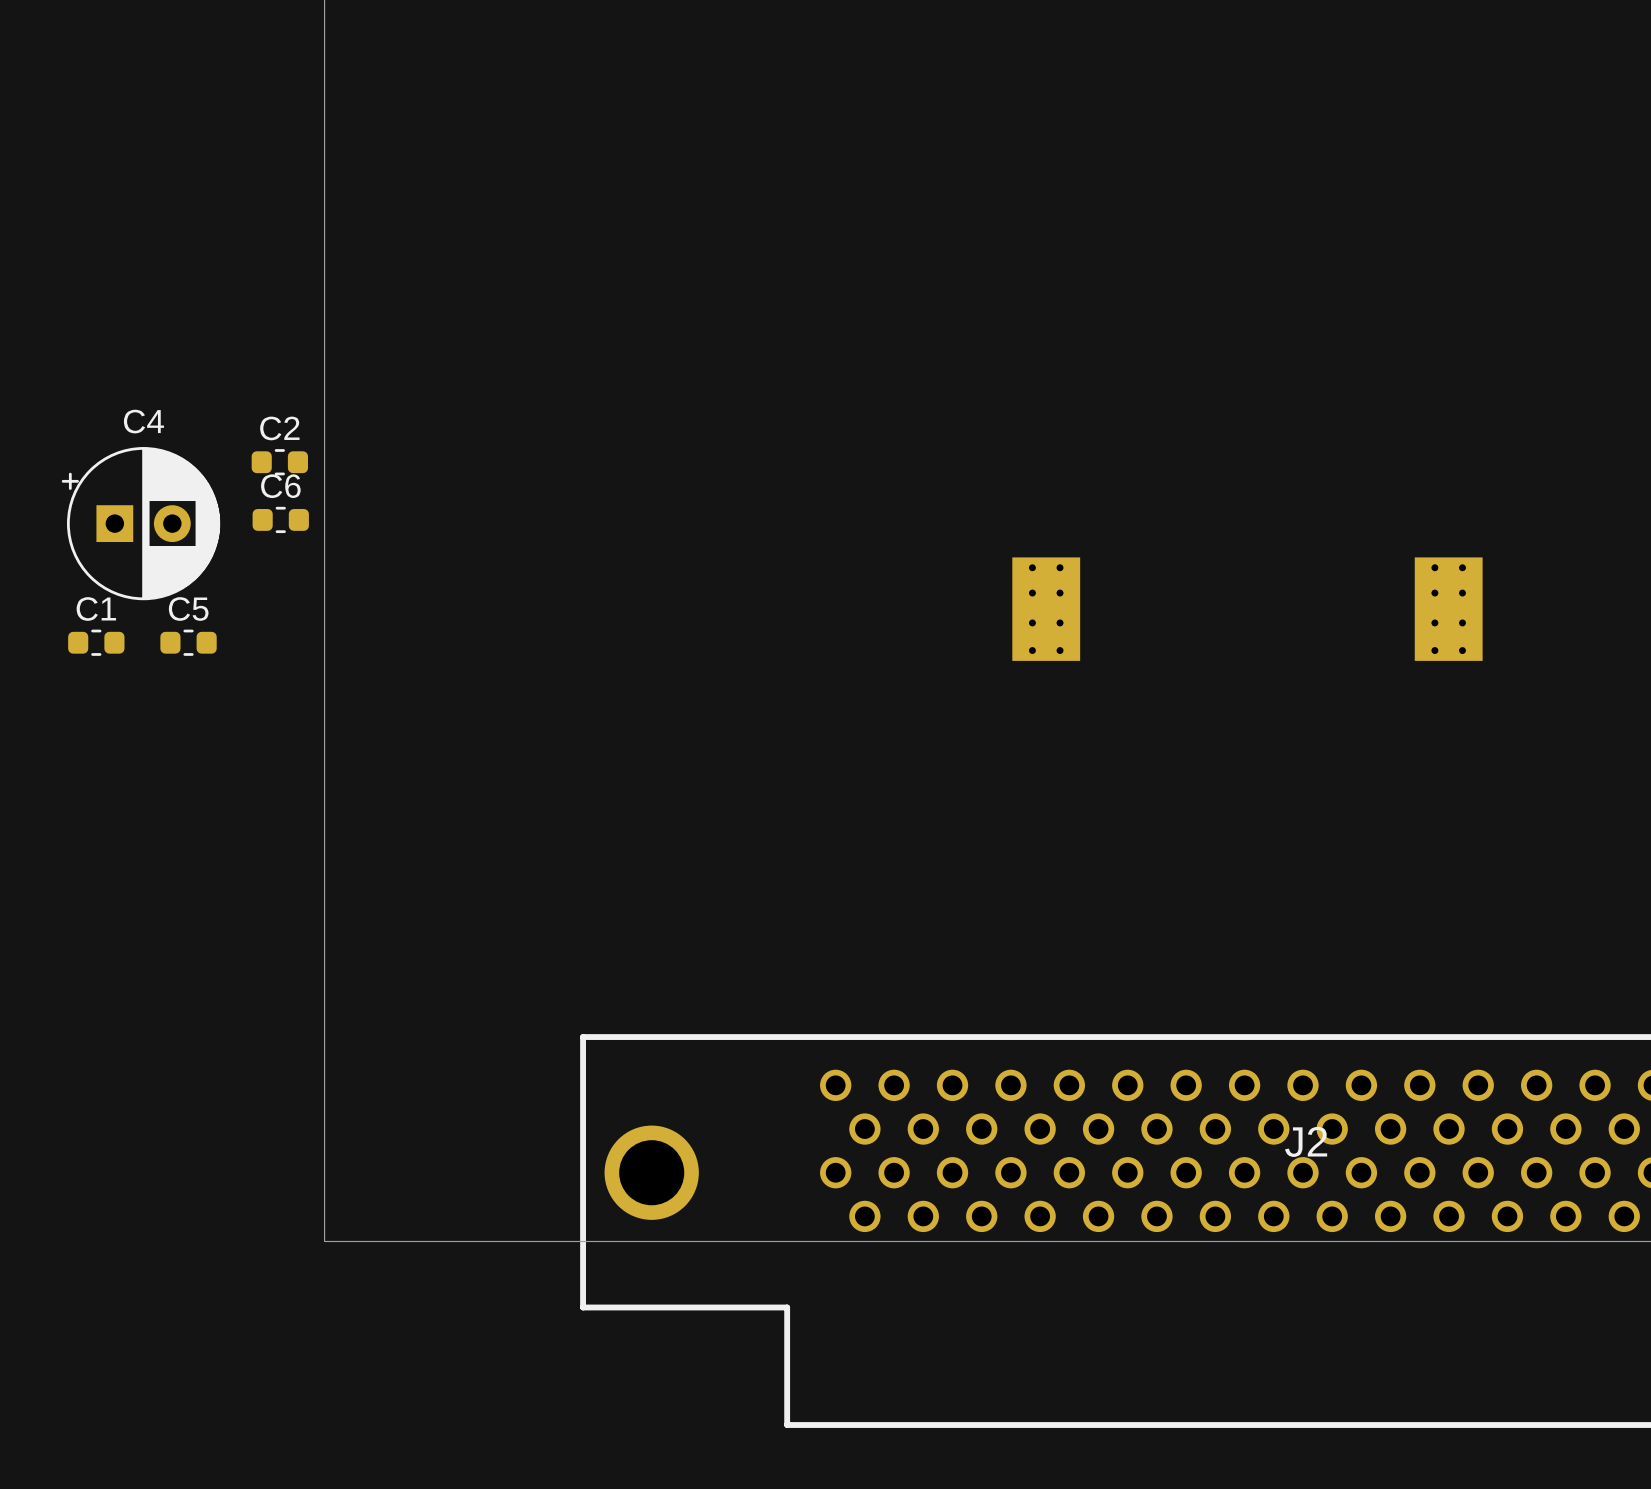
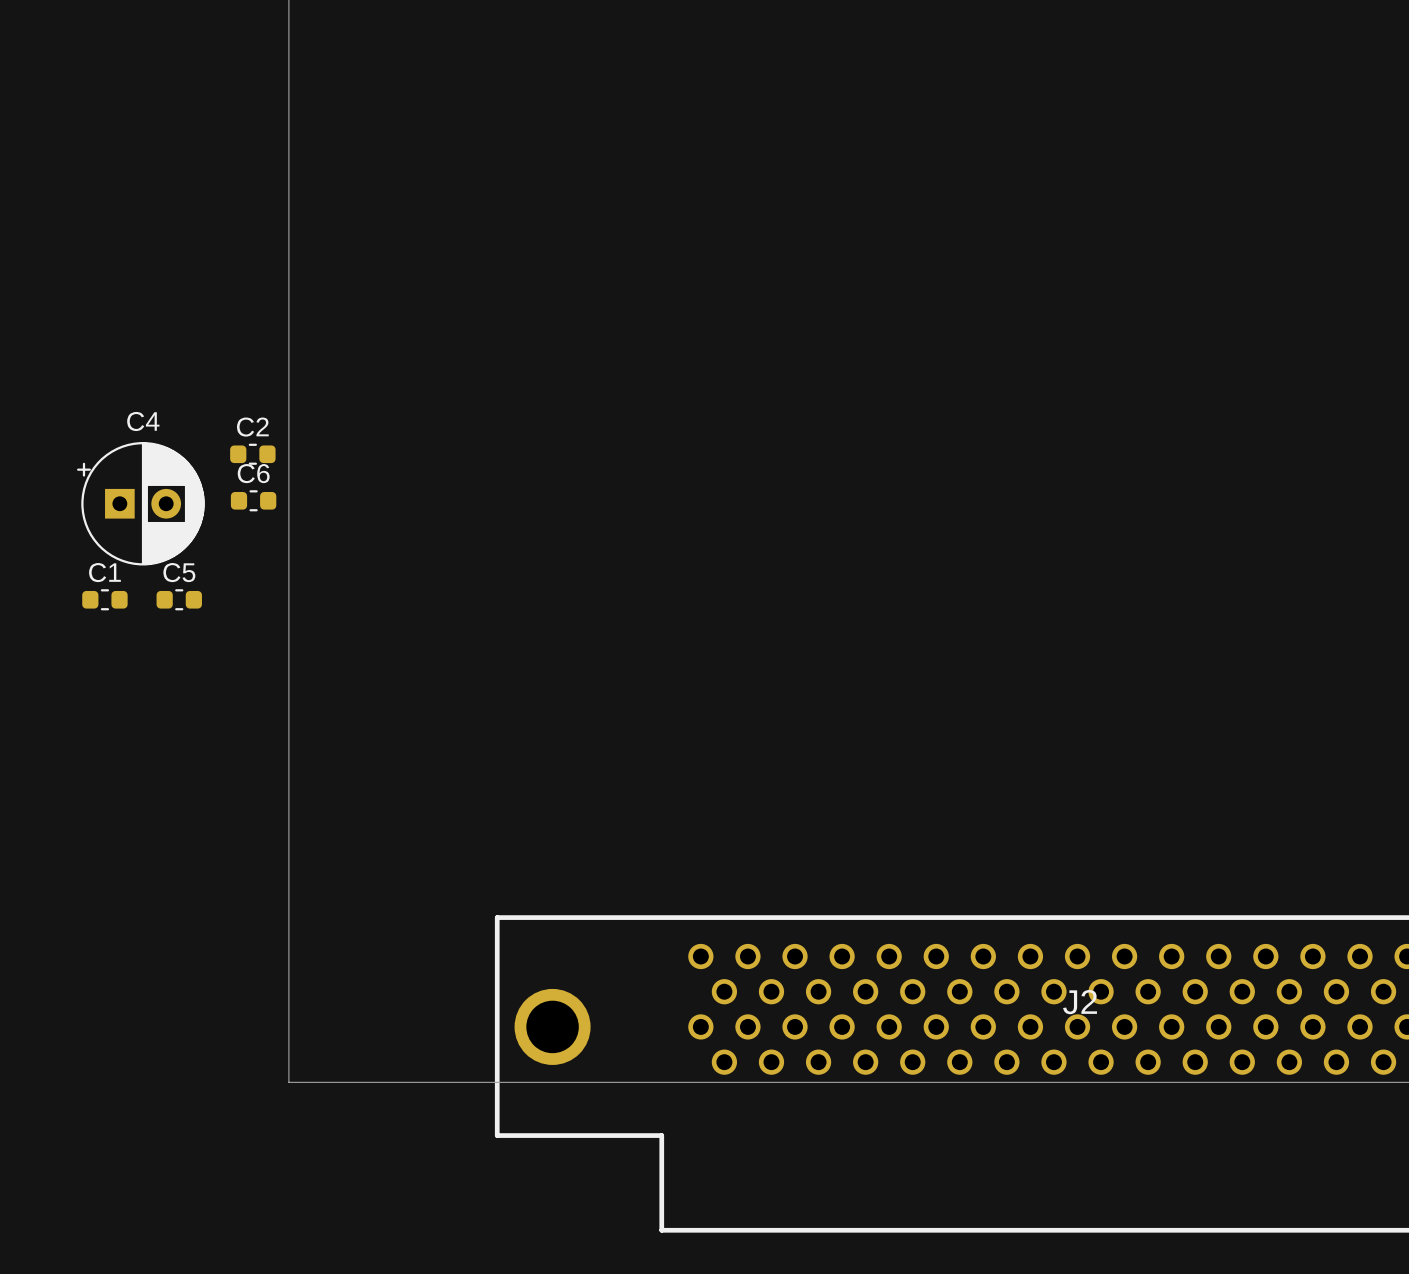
part: (1046, 609) -> none
part: (1448, 609) -> none

